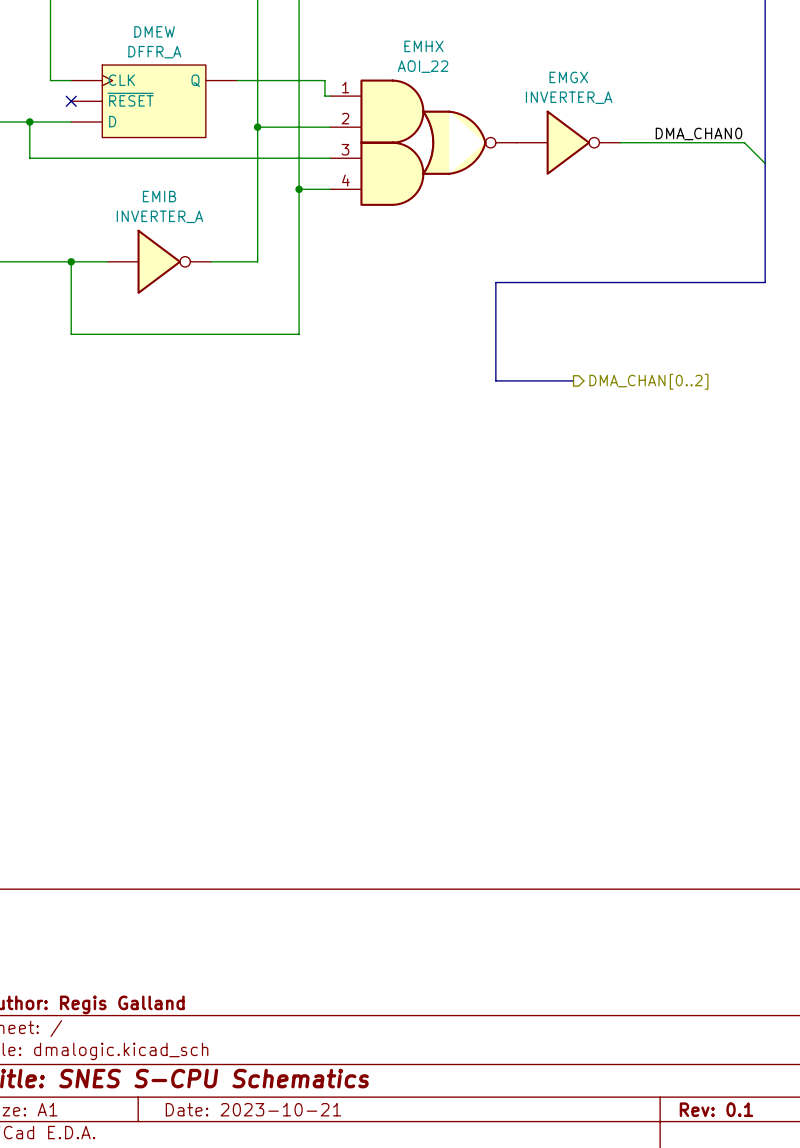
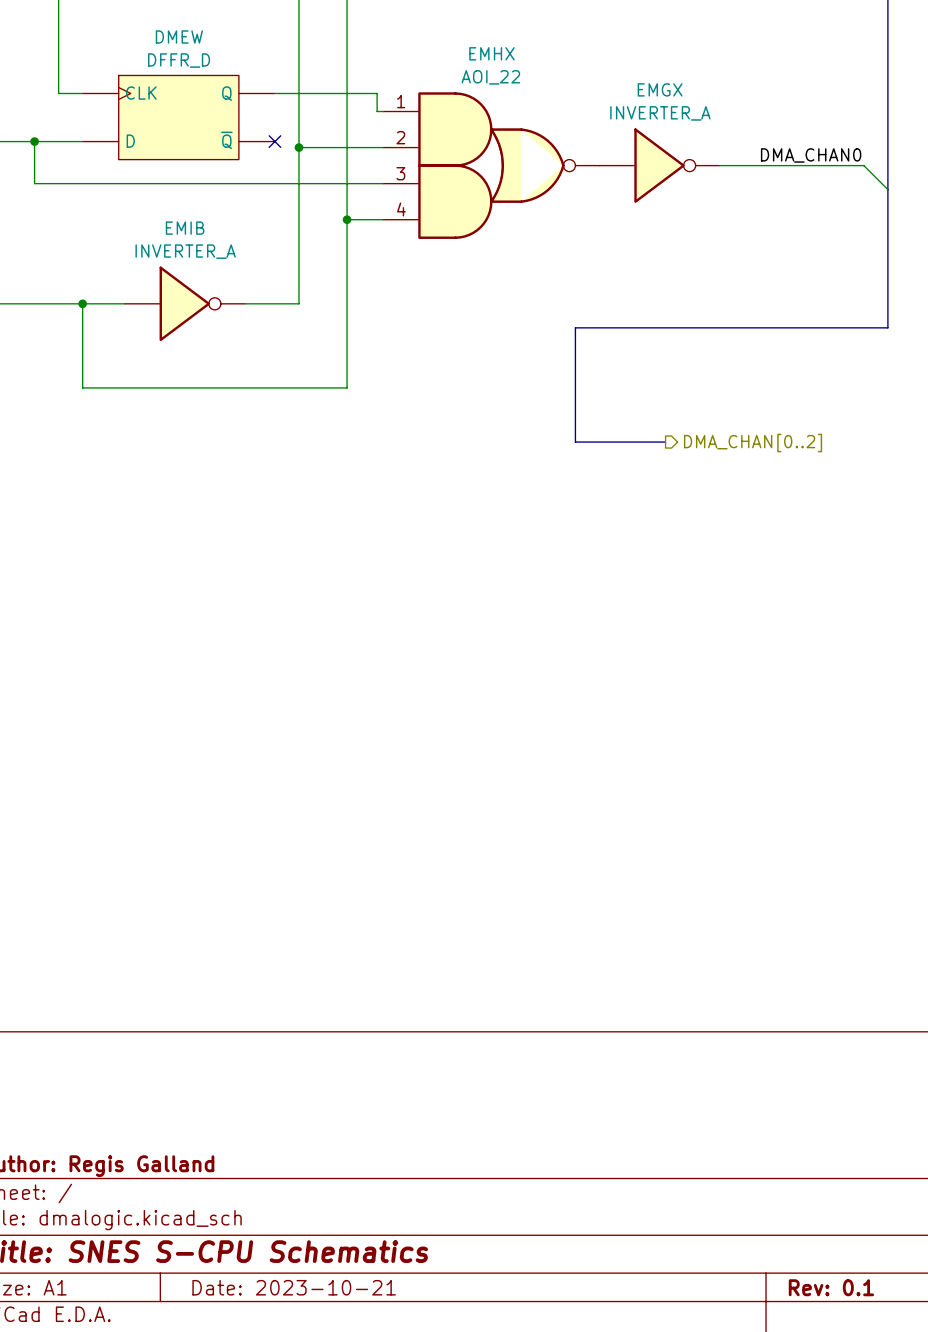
DMEW value: DFFR_A (154, 52) -> DFFR_D (179, 60)
DMEW symbol: [71, 65, 237, 138] -> [82, 75, 275, 160]
no-connect mark: (71, 101) -> none
no-connect mark: none -> (274, 141)

